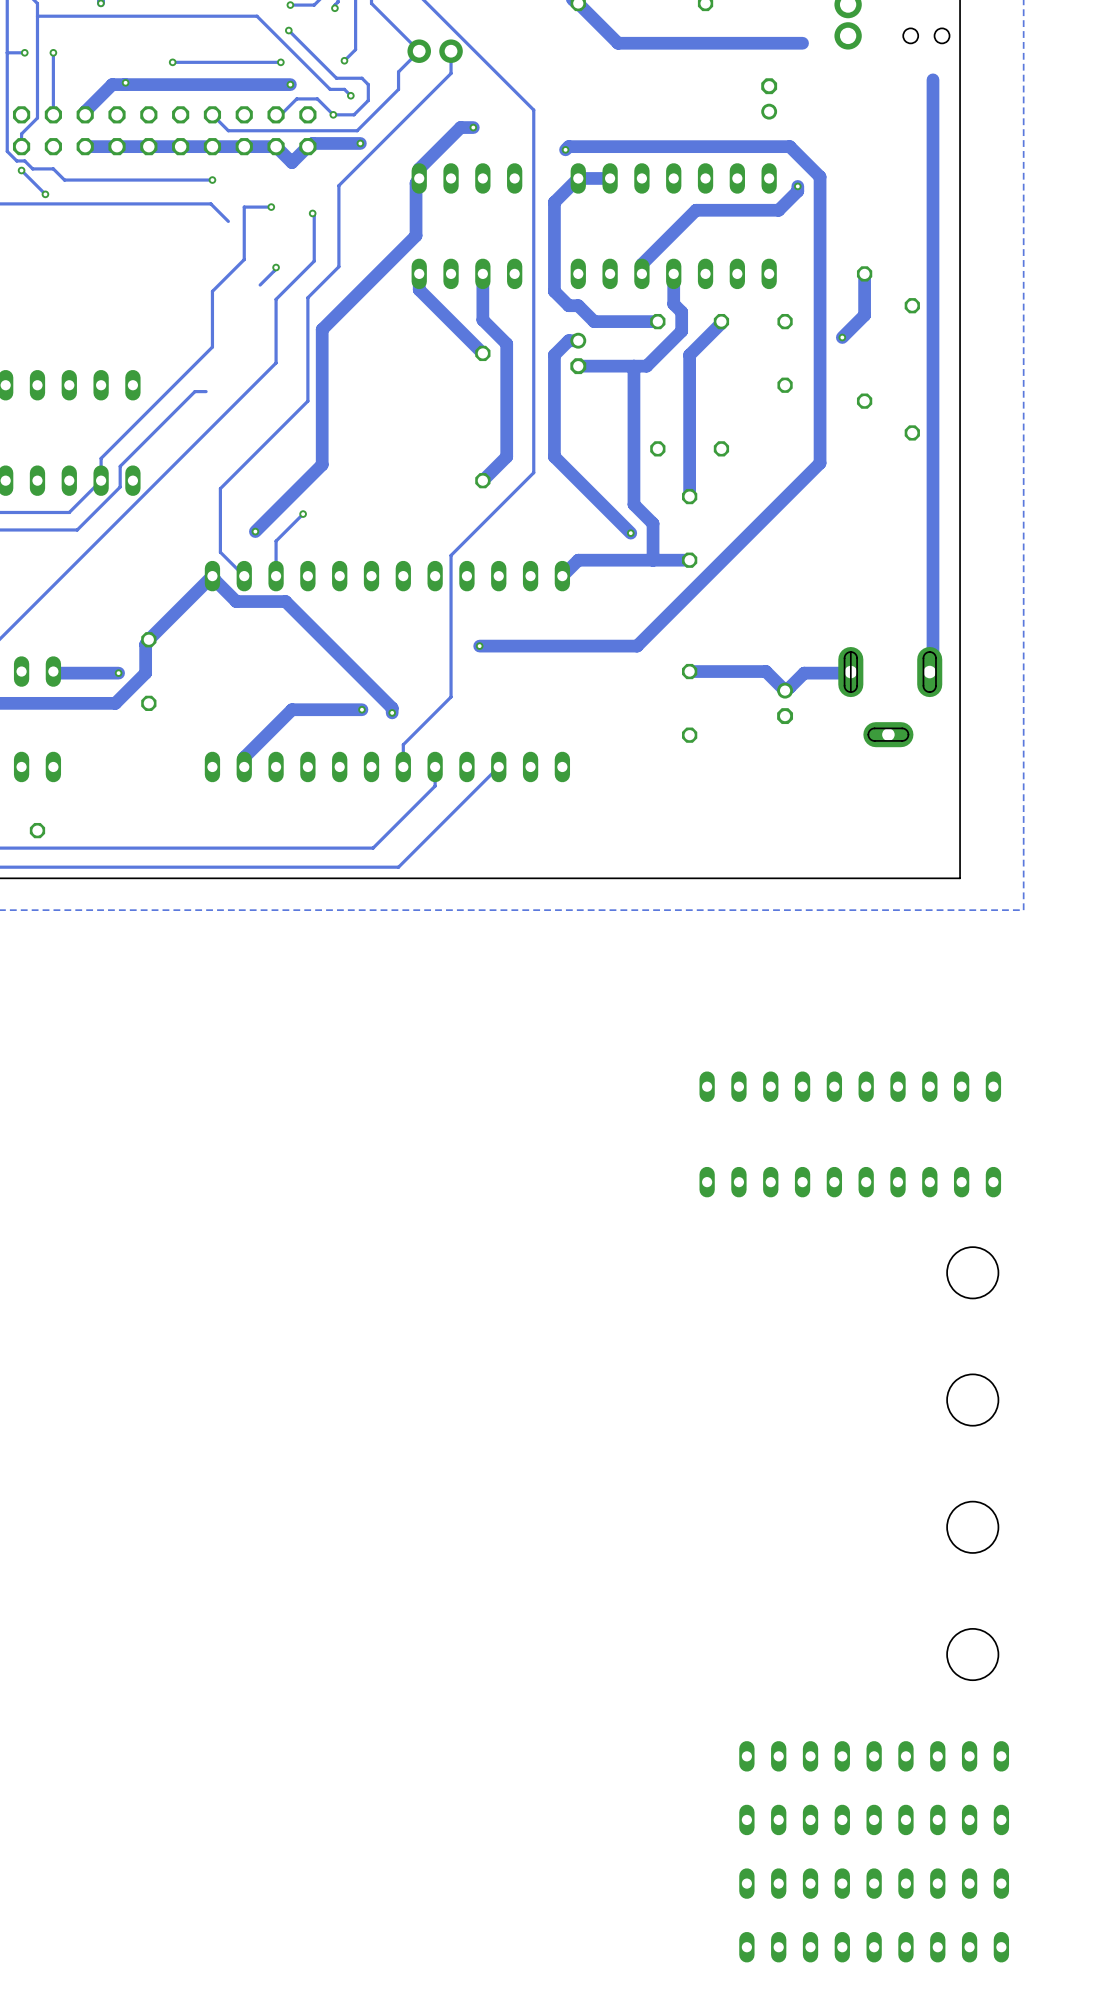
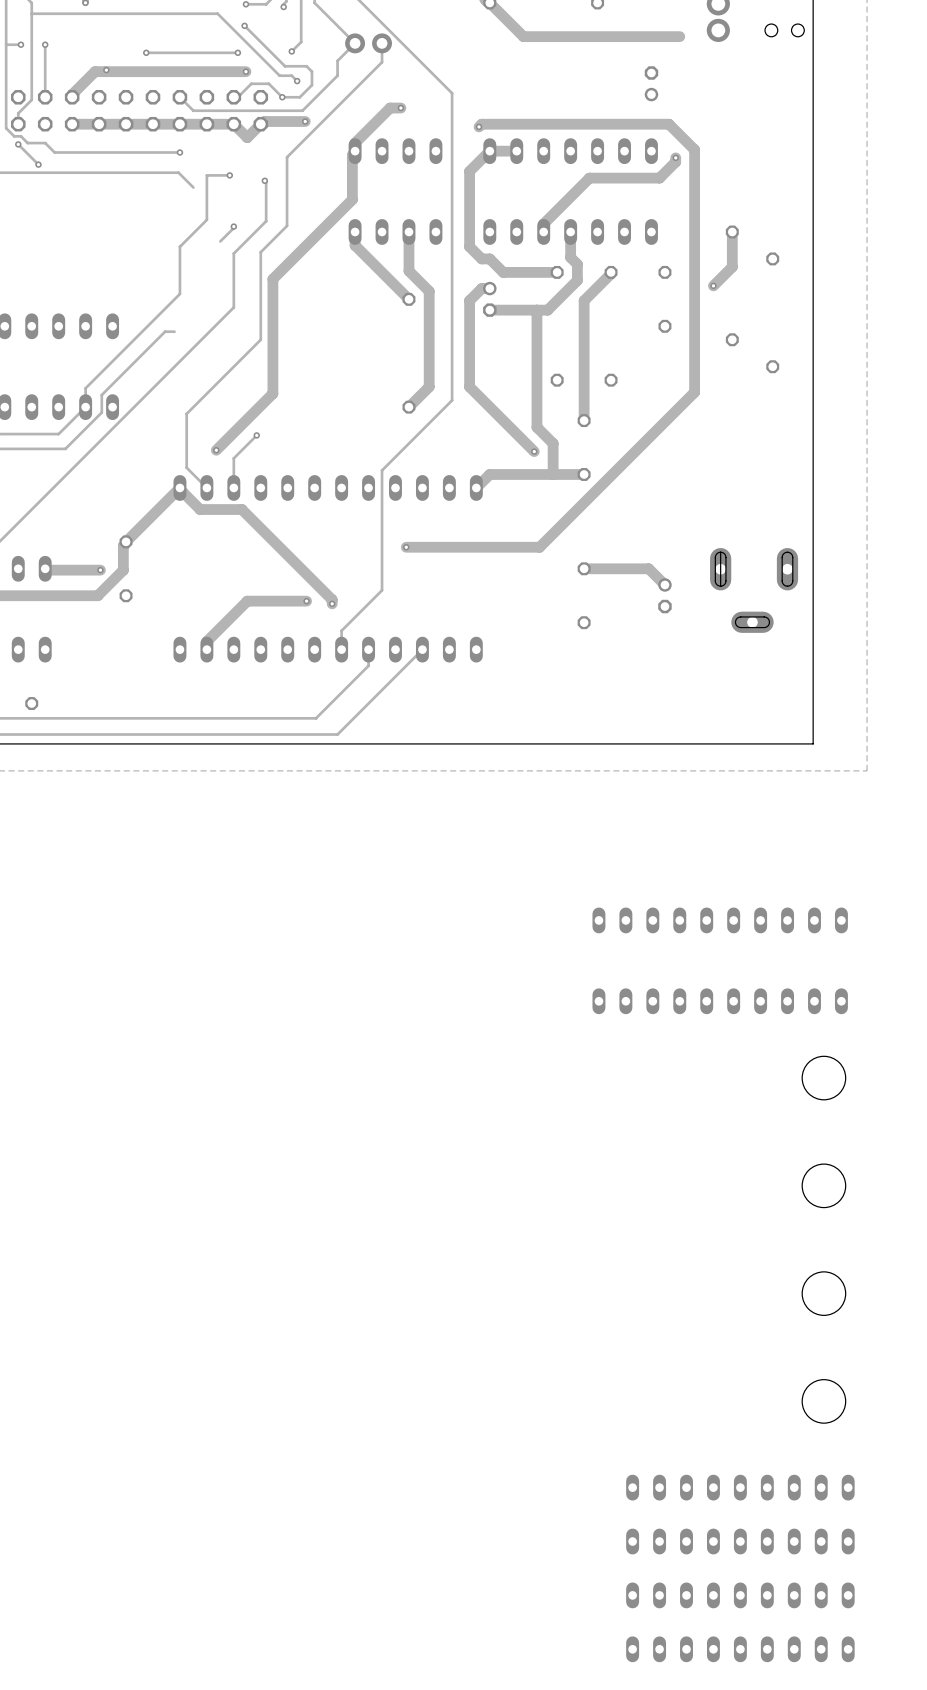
track: (932, 79) (932, 660) (929, 663) (929, 672) -> none
track: (850, 672) (804, 673) (785, 690) -> none

